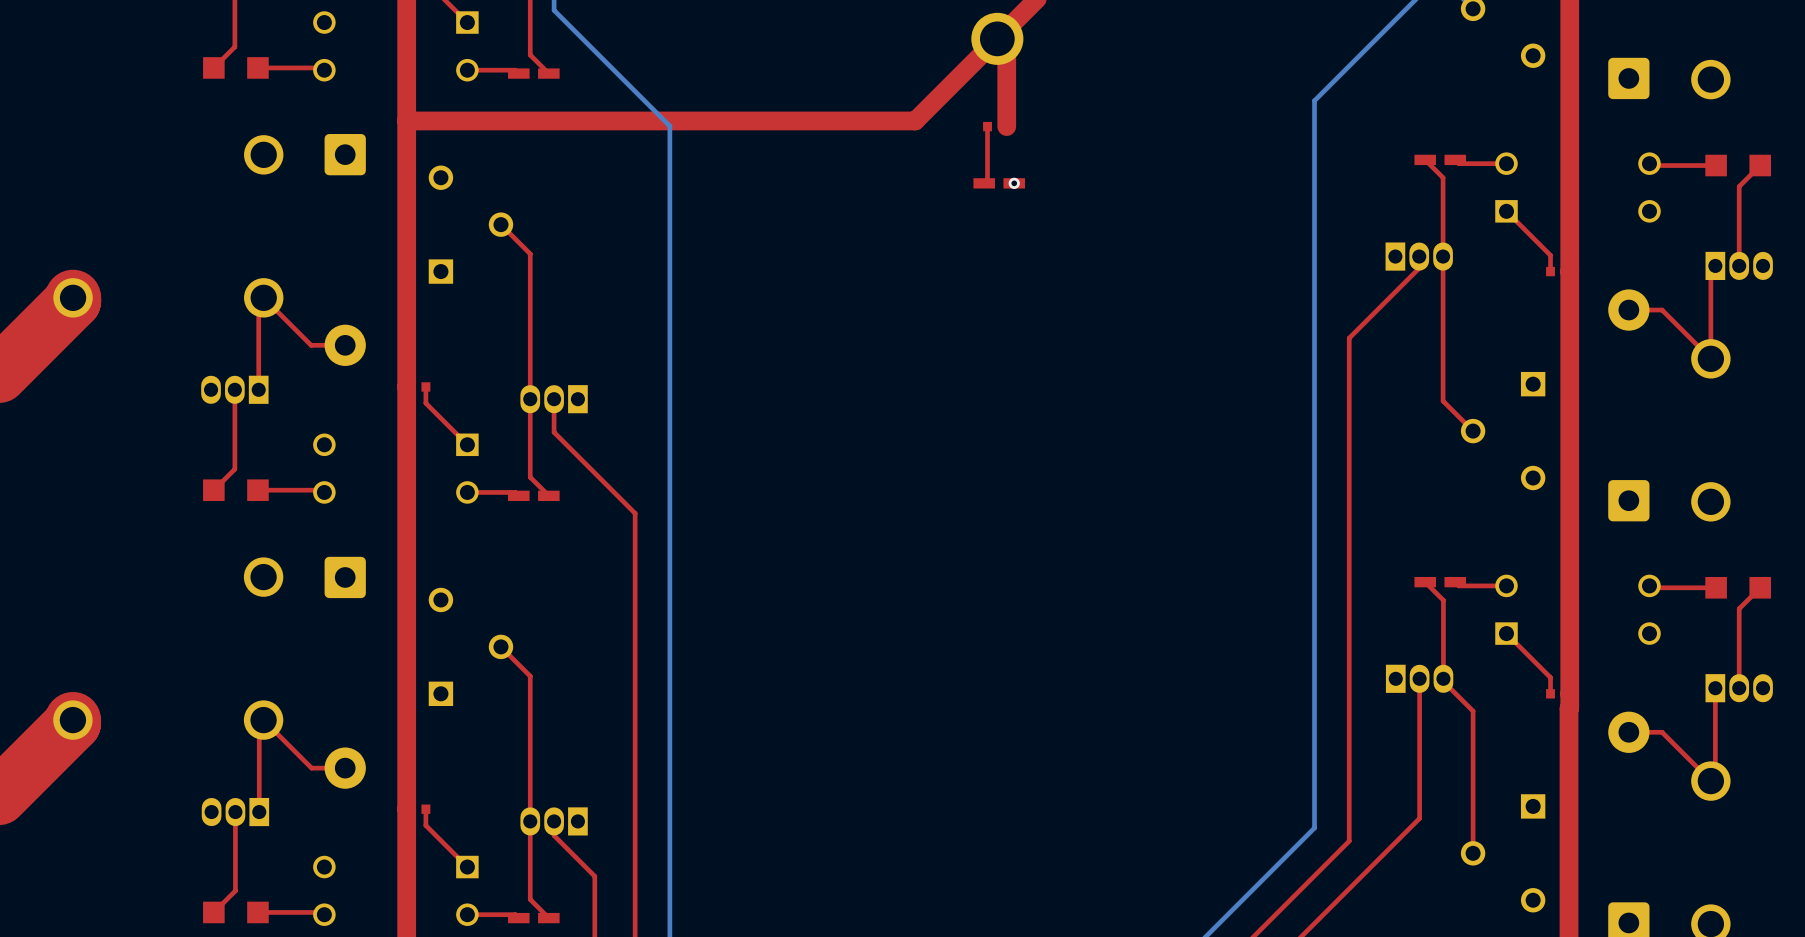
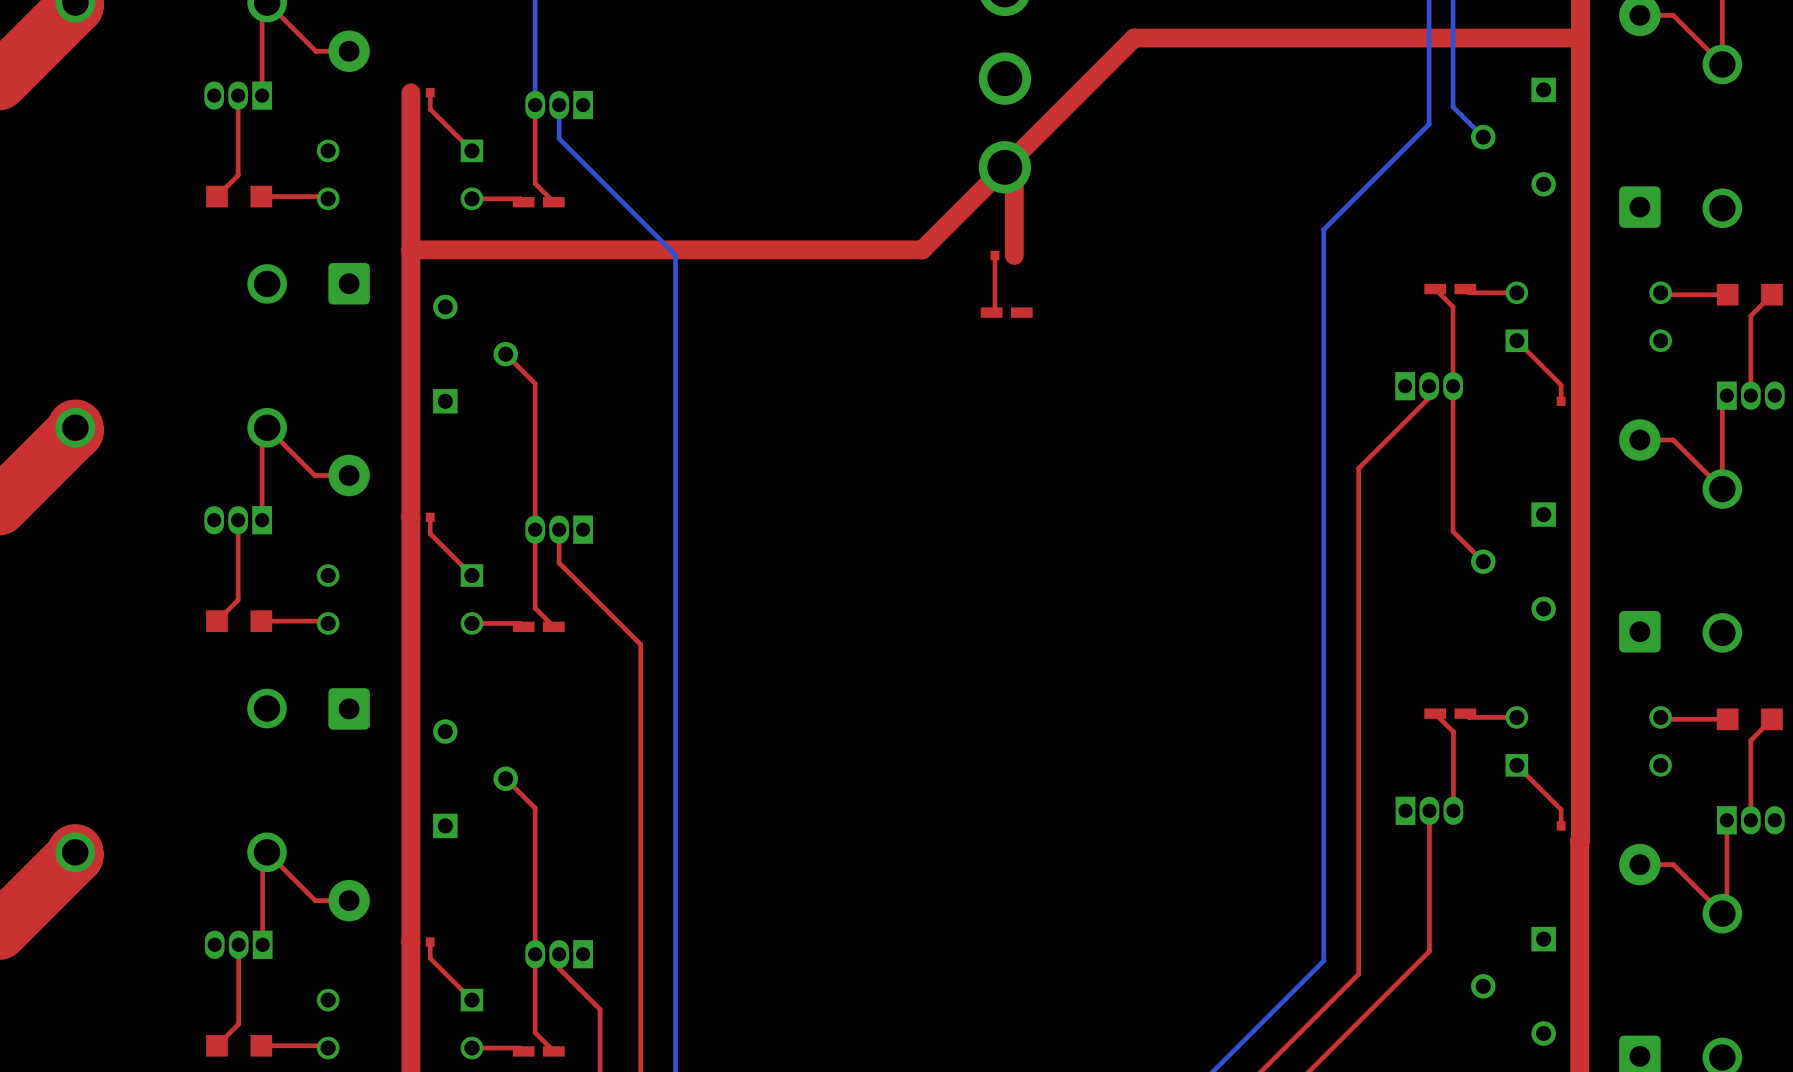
via: (1014, 183) -> none
top track: (1443, 678) (1443, 681) (1473, 711) (1473, 853) -> none

